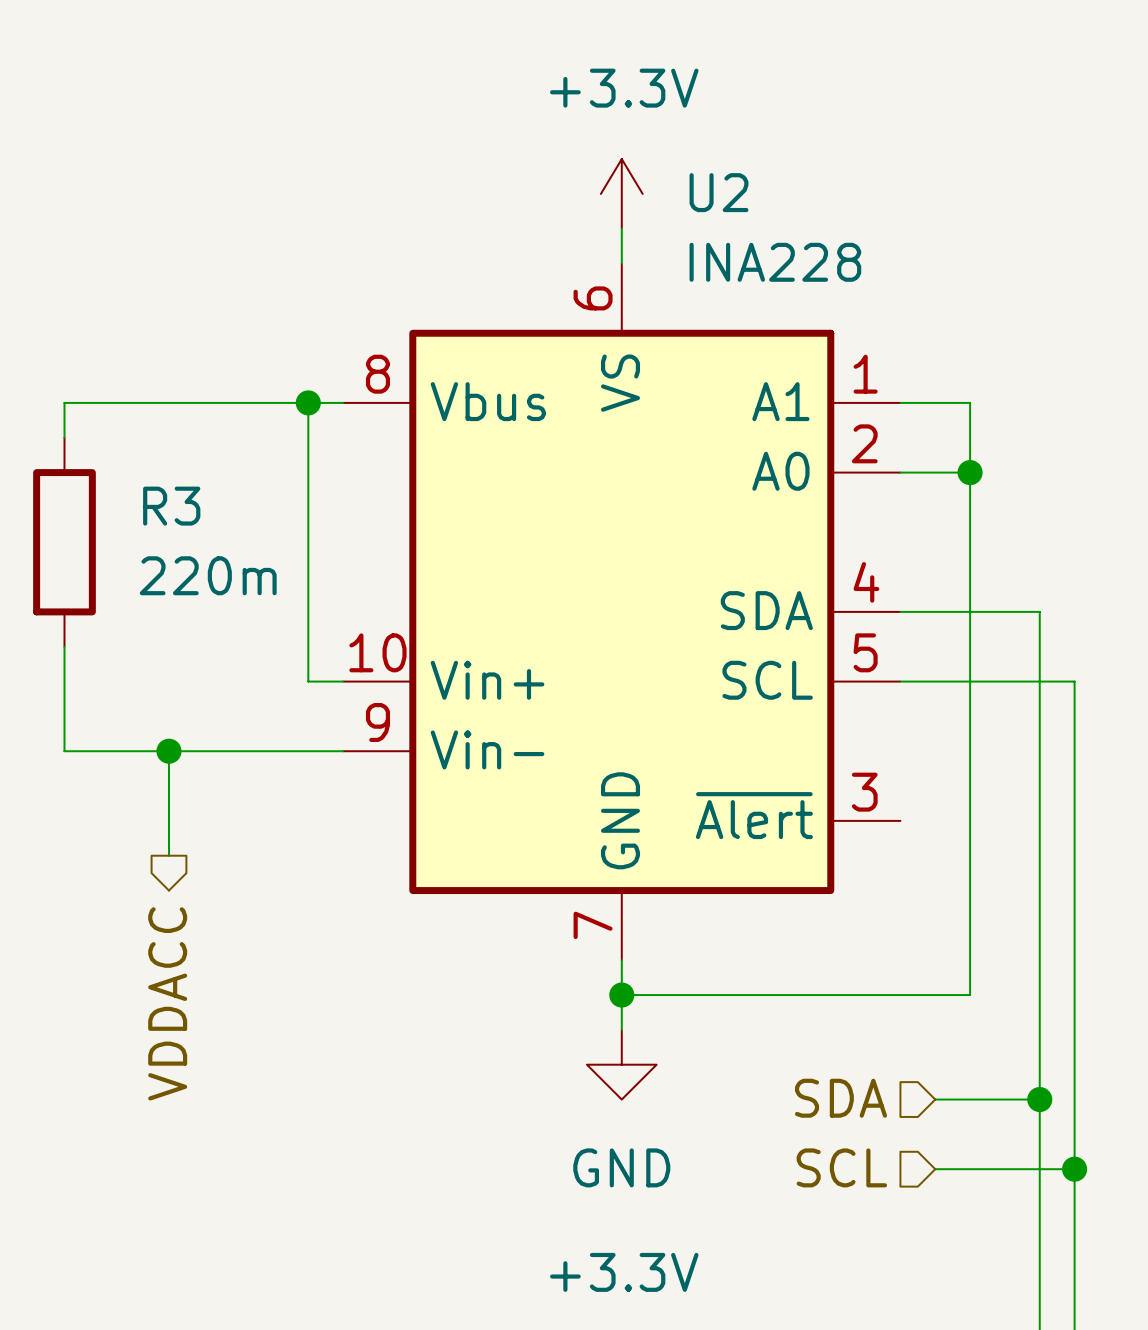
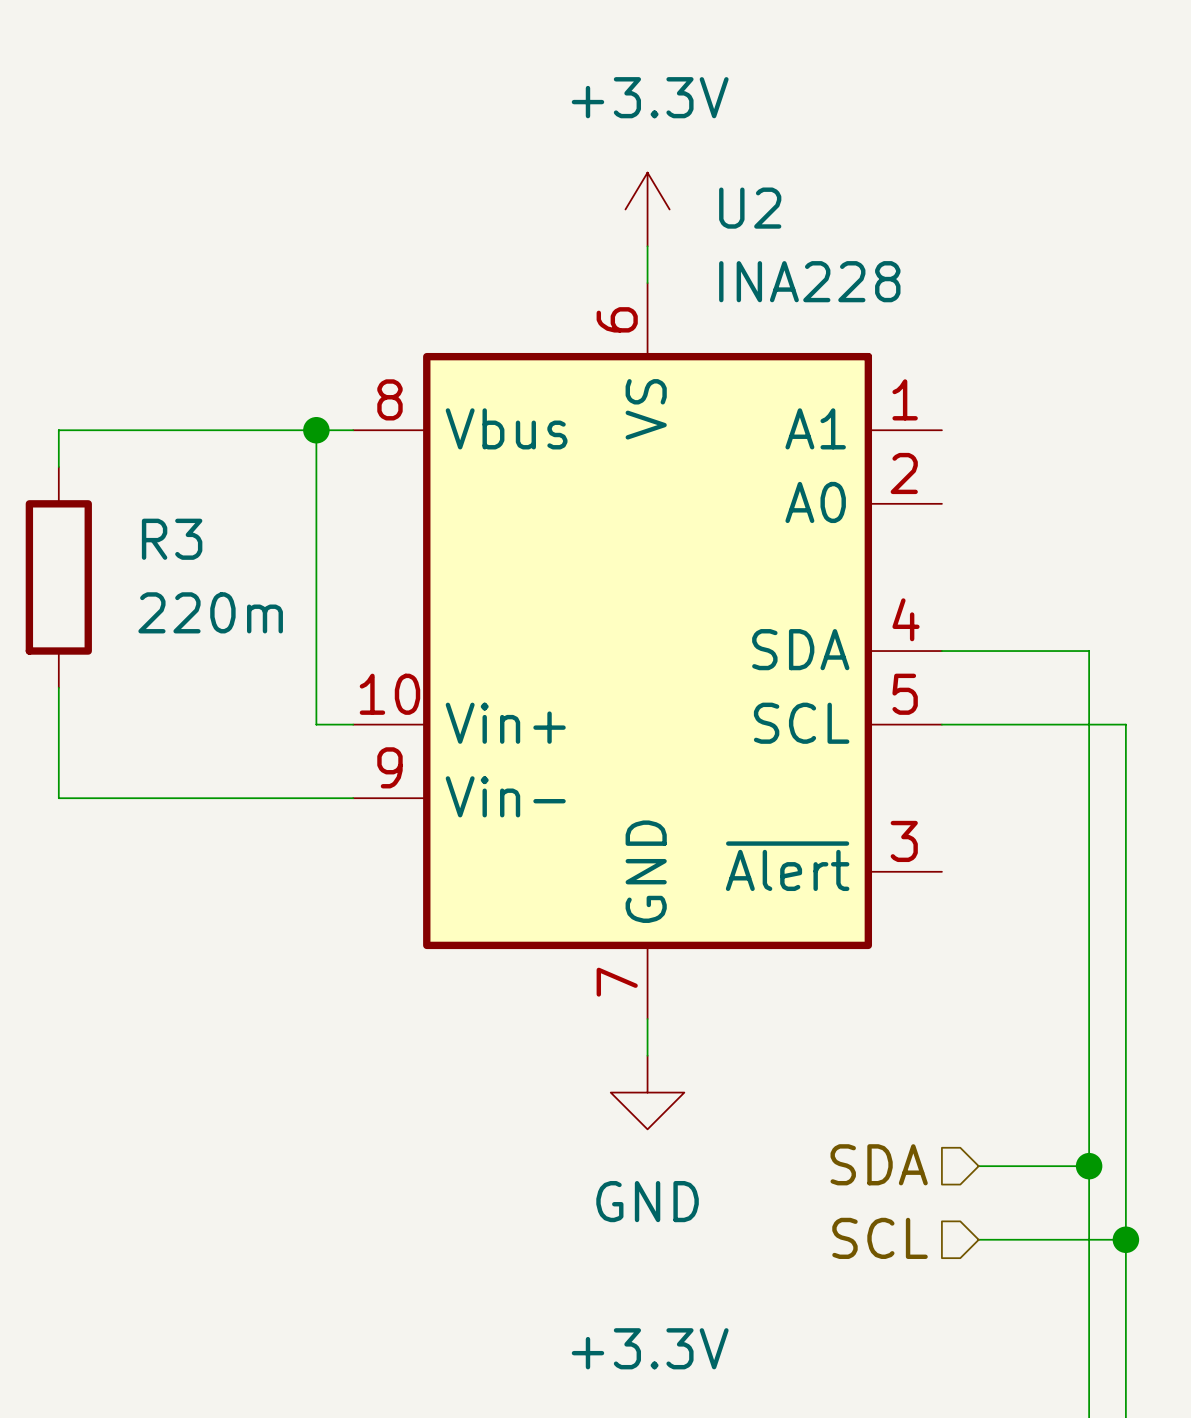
wire: (900, 402) (970, 402) (970, 995) (621, 995) (621, 1029) -> none
wire: (900, 472) (970, 472) -> none
junction: (970, 472) -> none
wire: (168, 751) (168, 855) -> none
junction: (168, 751) -> none
junction: (621, 995) -> none
hierarchical label: VDDACC (167, 1003) -> none
power symbol position: GND (621, 1064) -> GND (647, 1092)

